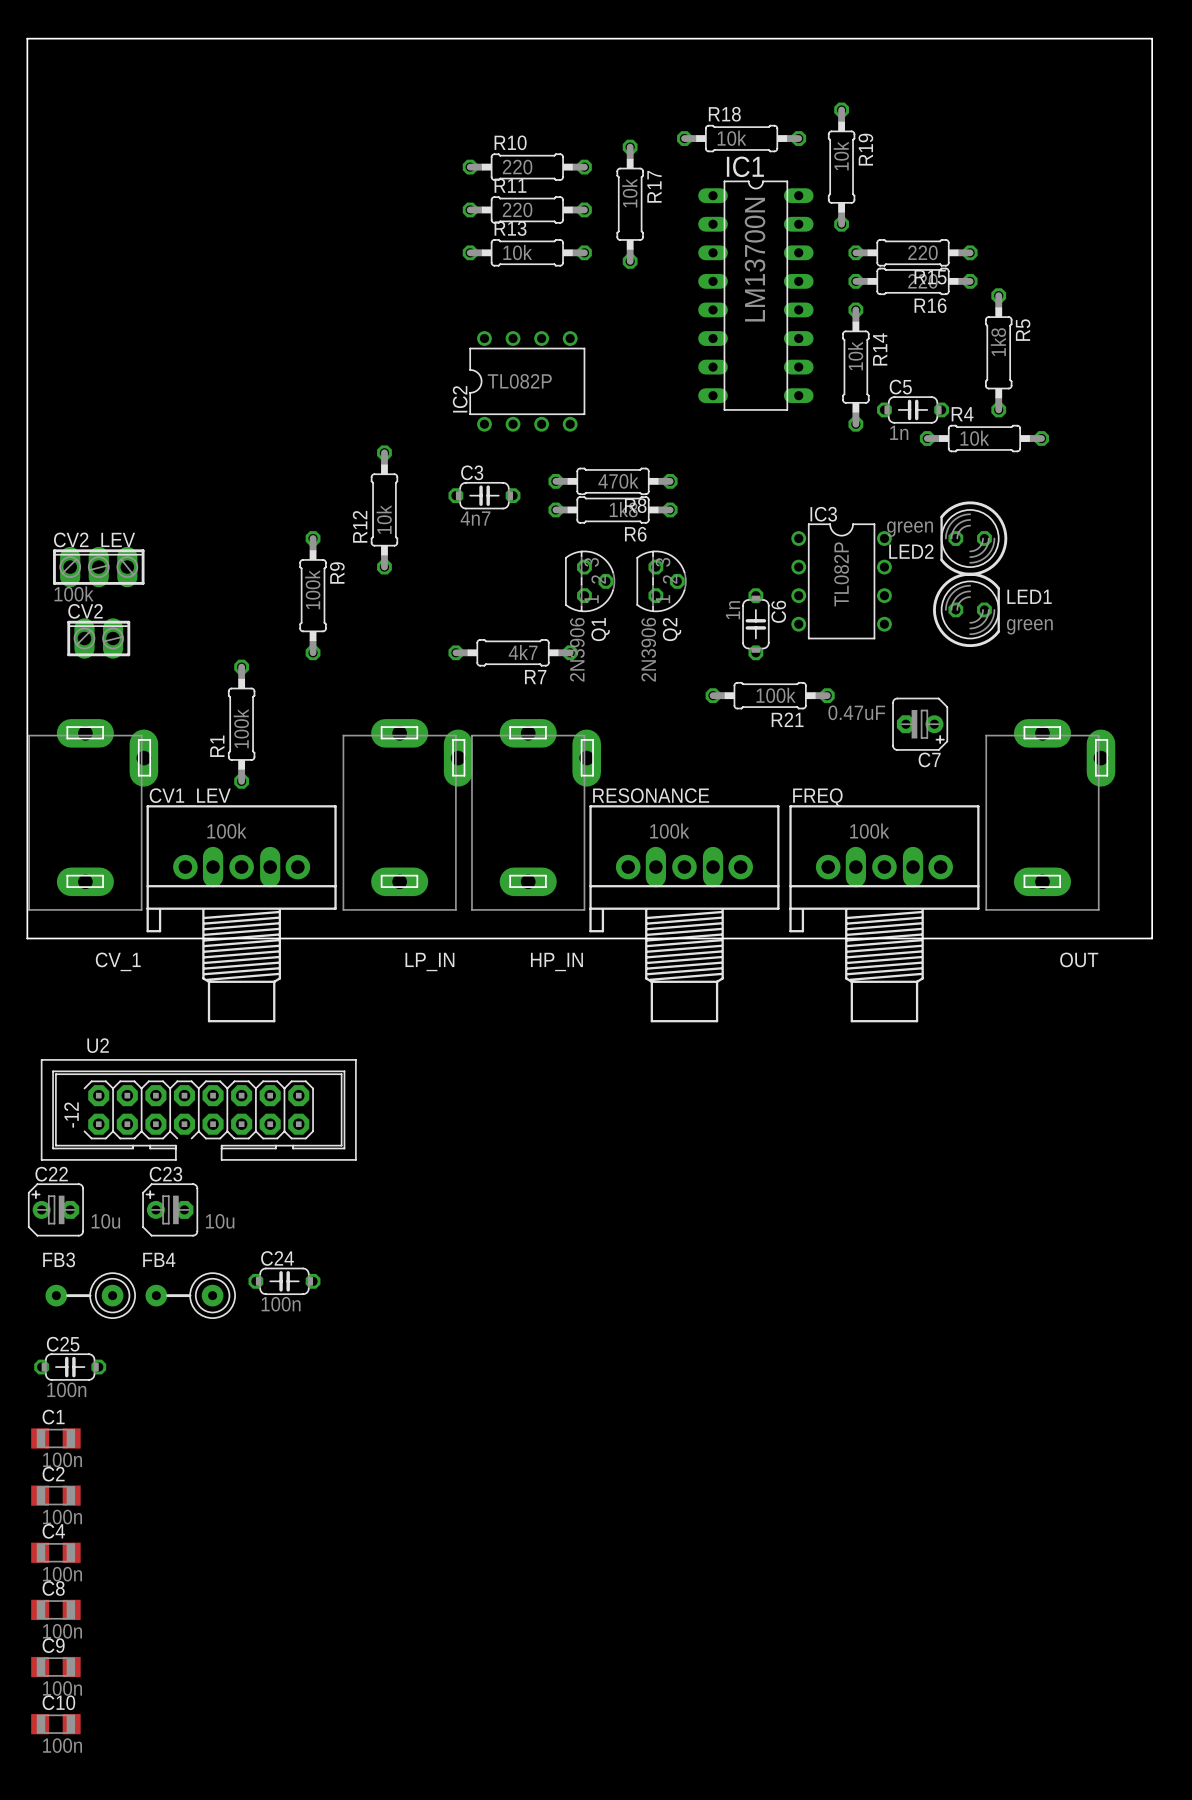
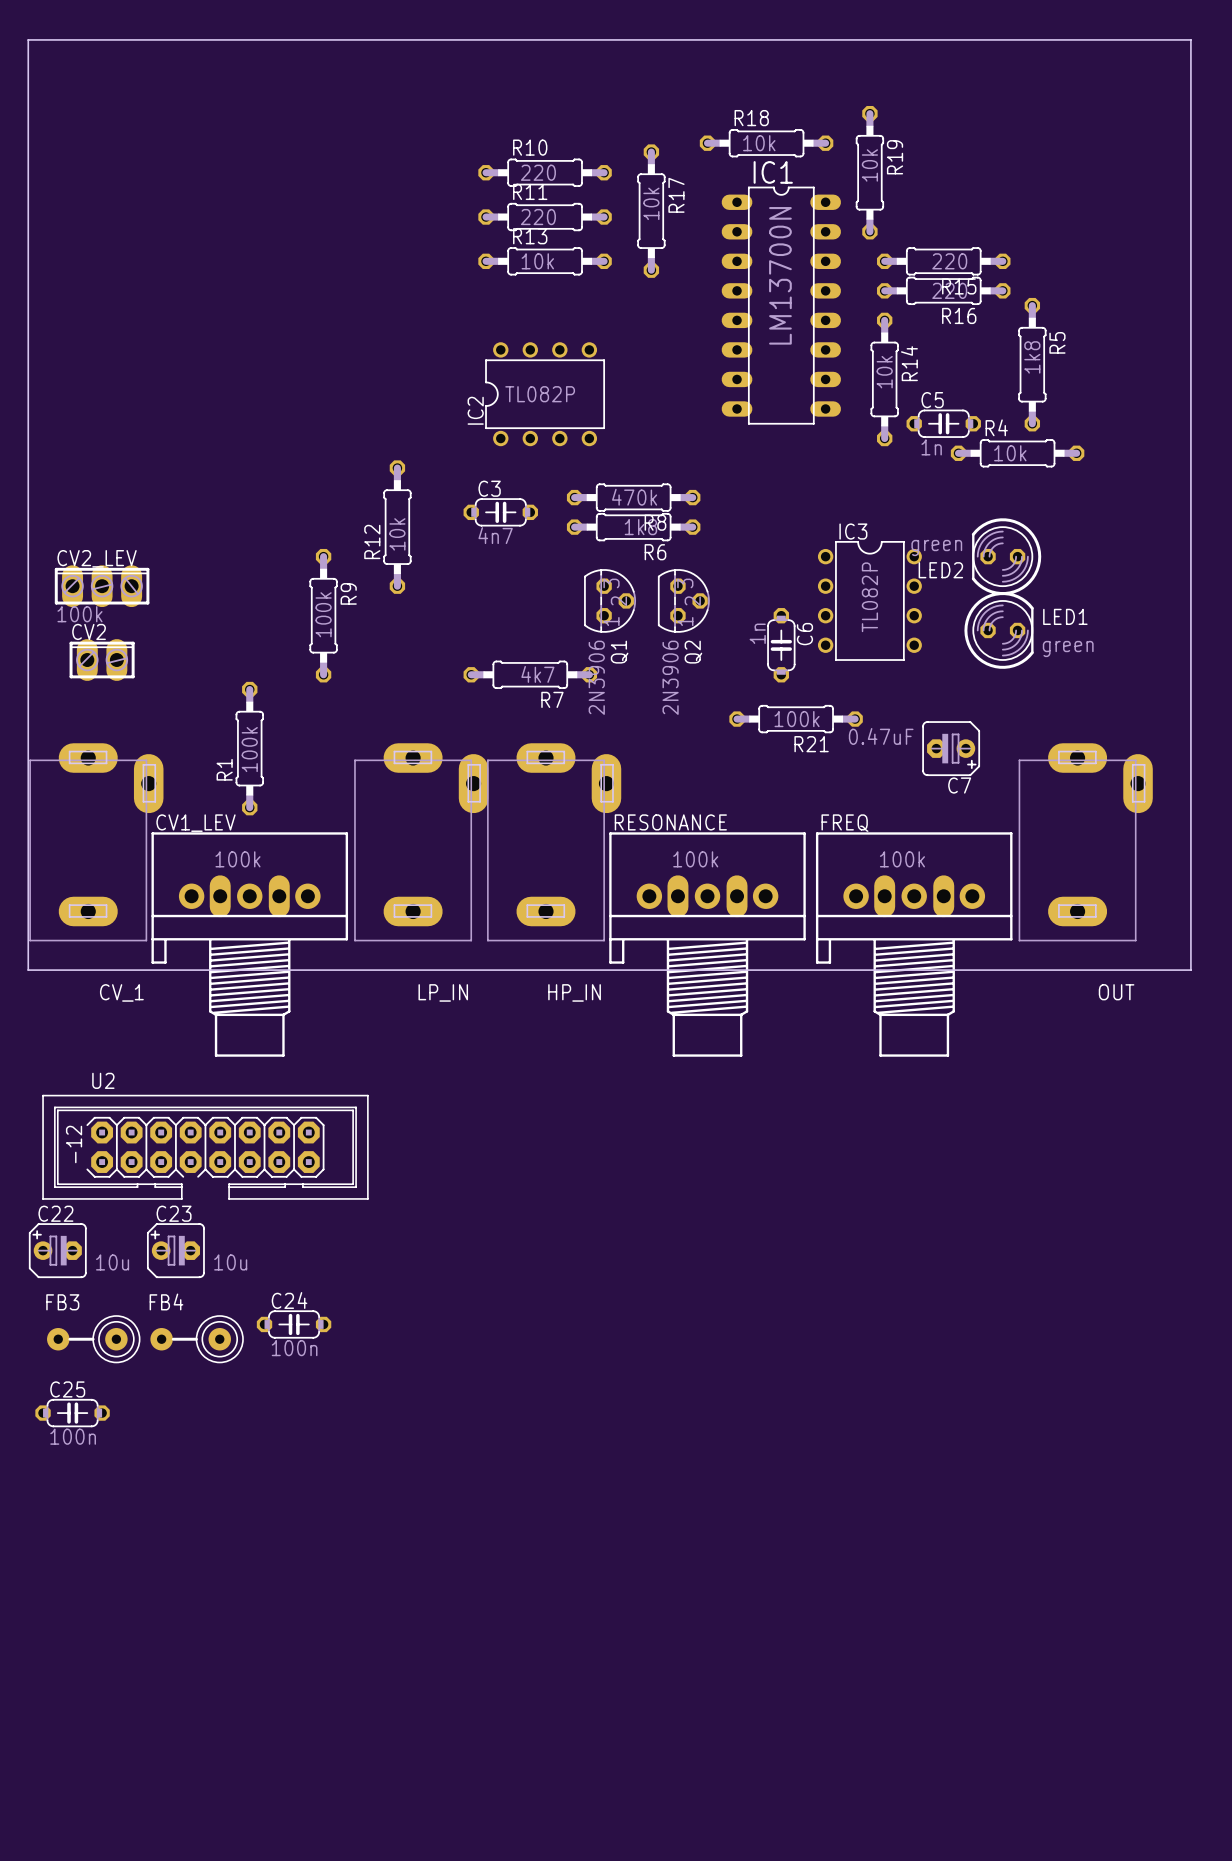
C1: 100n (55, 1438) -> none
C2: 100n (55, 1495) -> none
C4: 100n (55, 1552) -> none
C8: 100n (55, 1609) -> none
C9: 100n (55, 1667) -> none
C10: 100n (55, 1724) -> none

